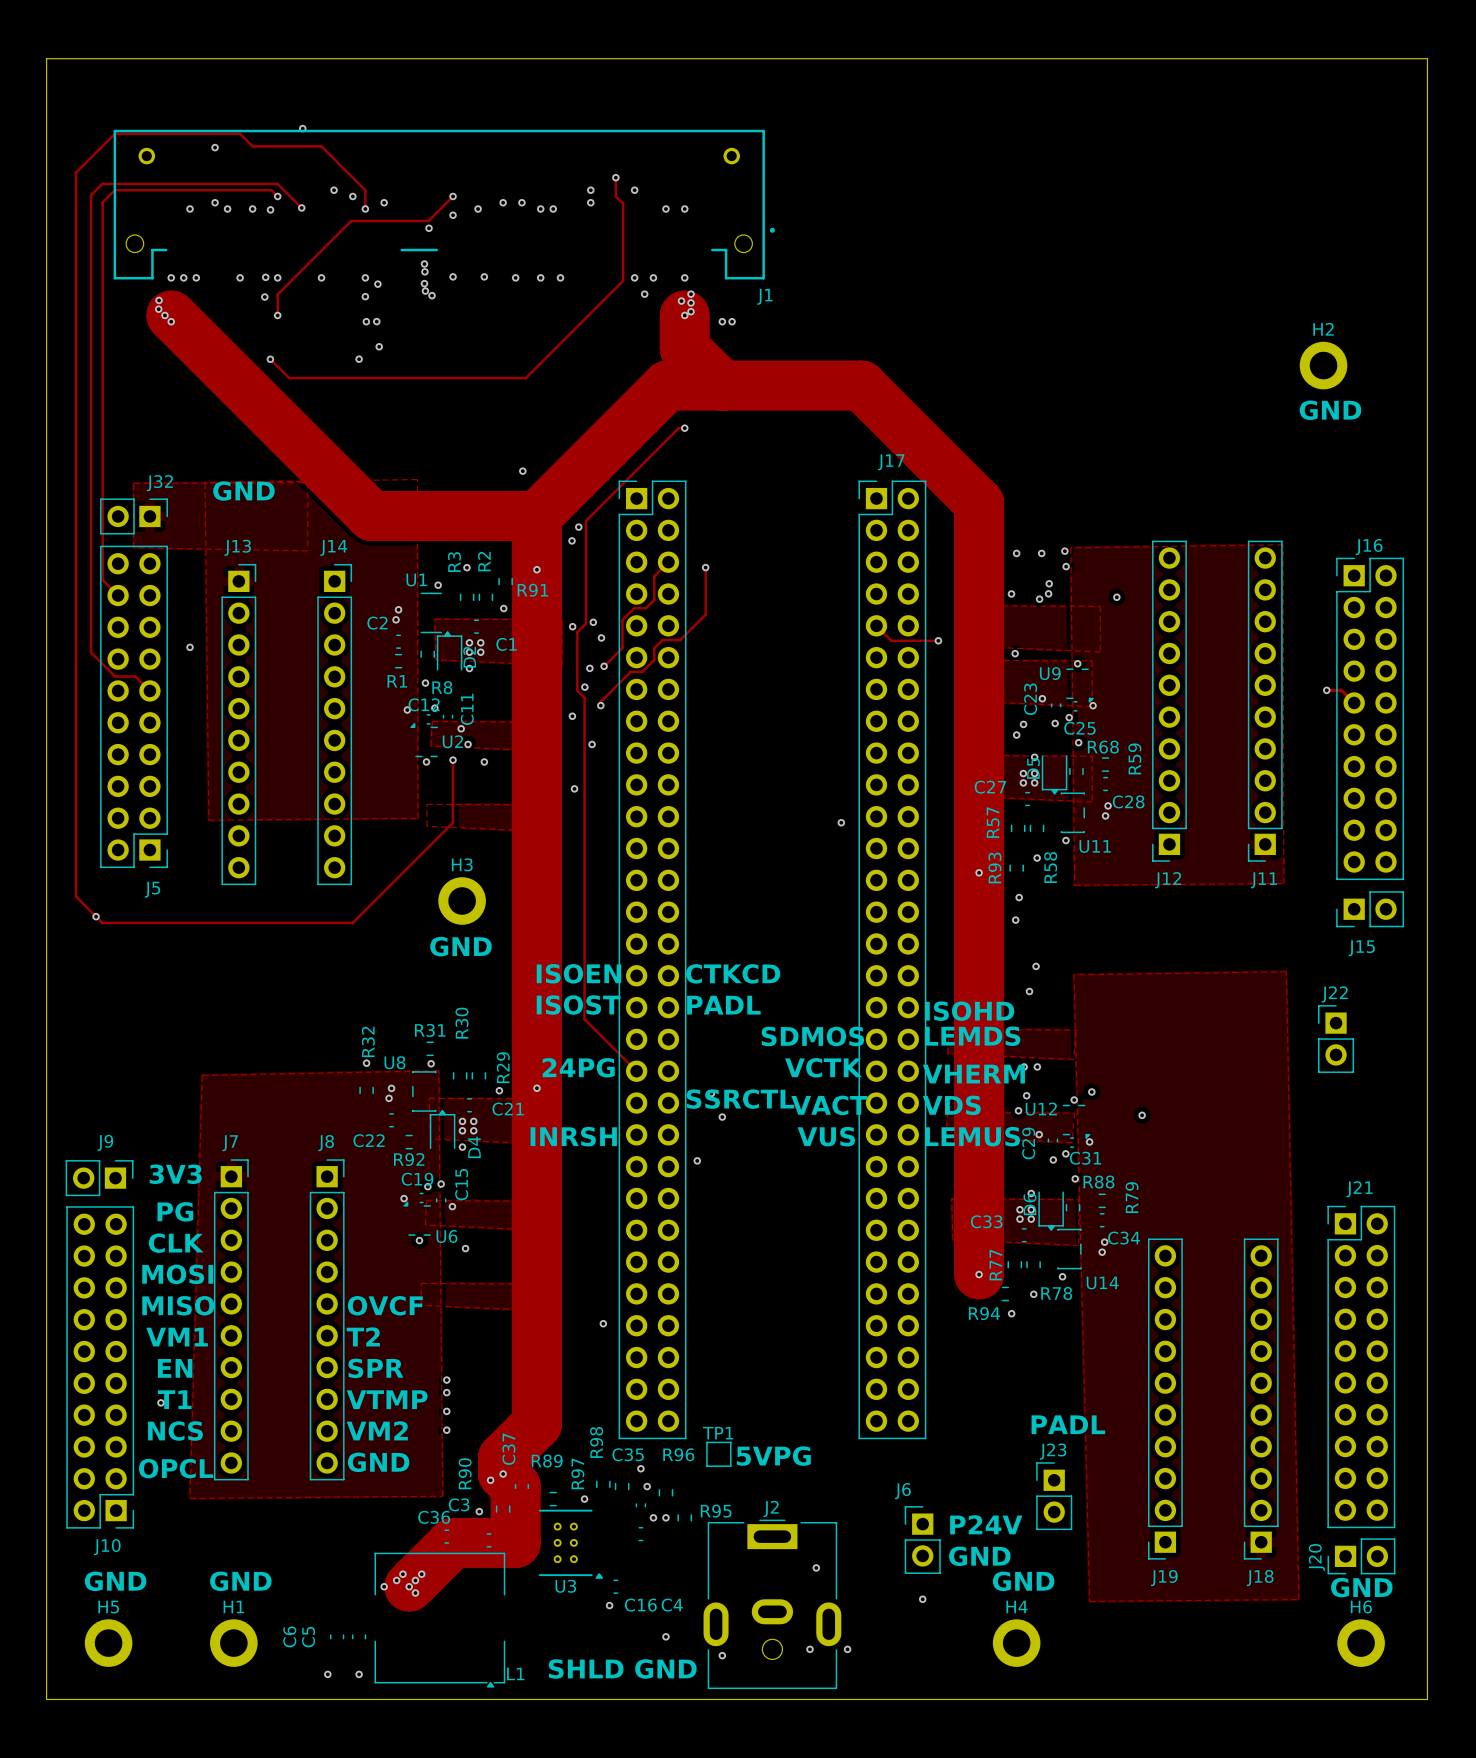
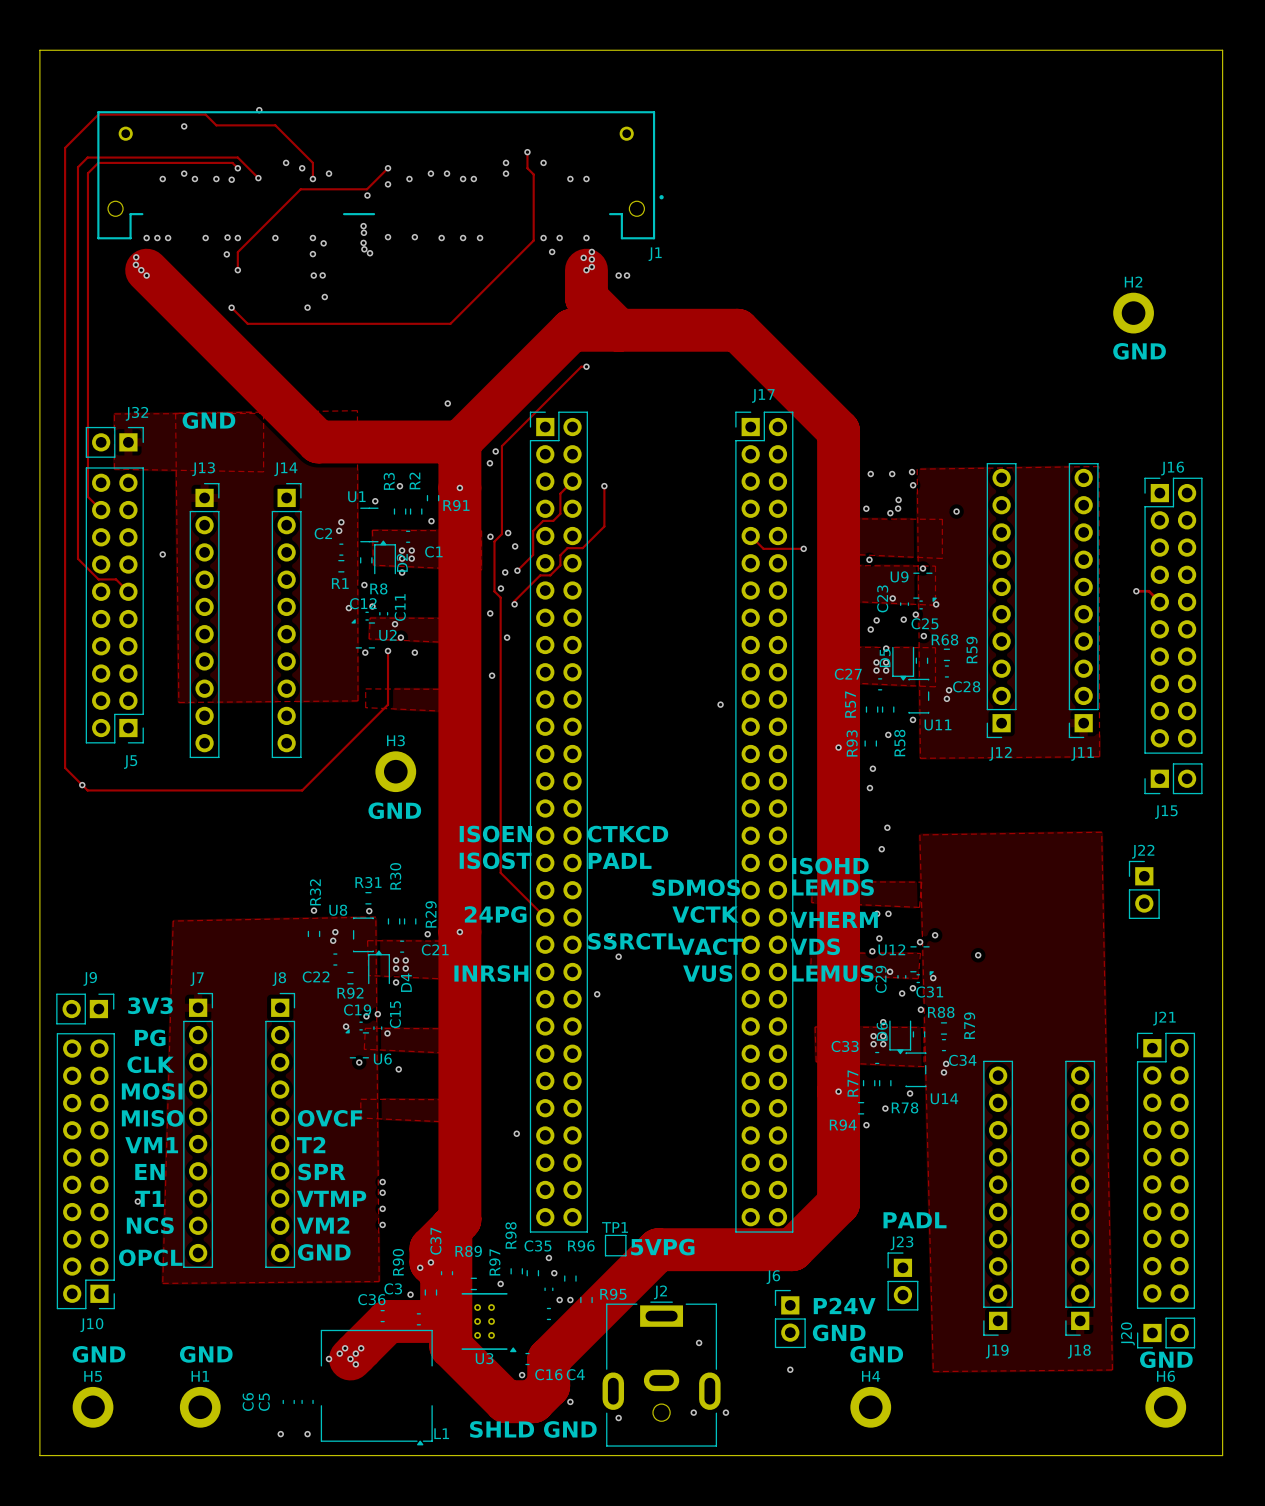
track: none -> (838, 1091) (838, 1203) (792, 1249) (658, 1249) (548, 1359) (548, 1386) (533, 1401) (506, 1401) (450, 1346) (450, 1228)

